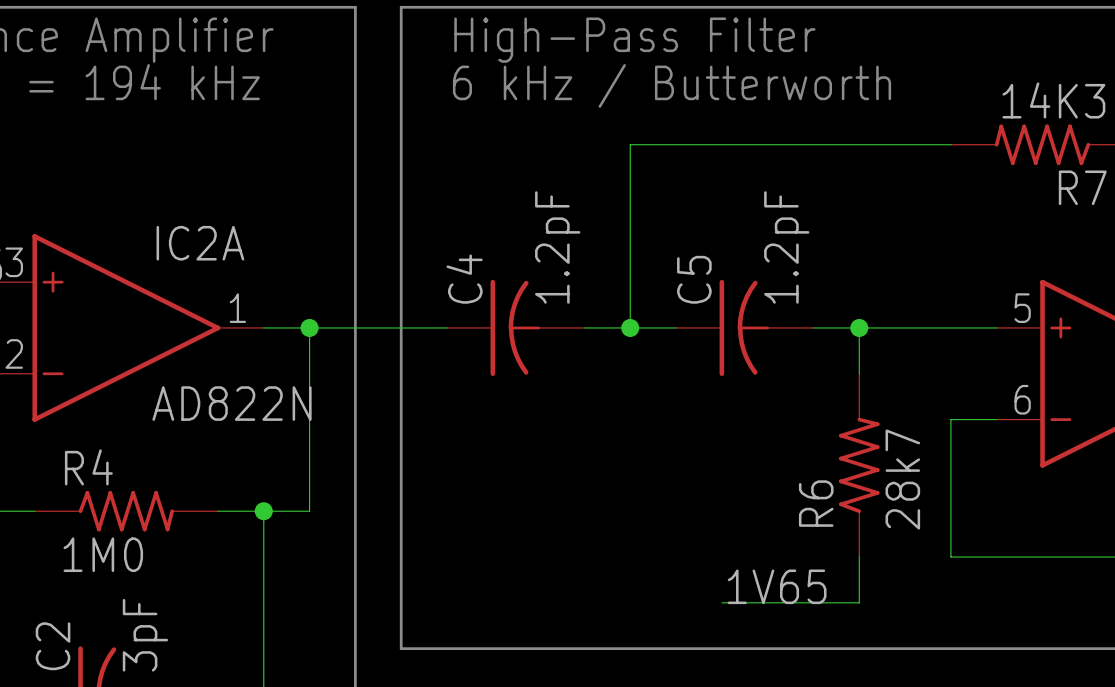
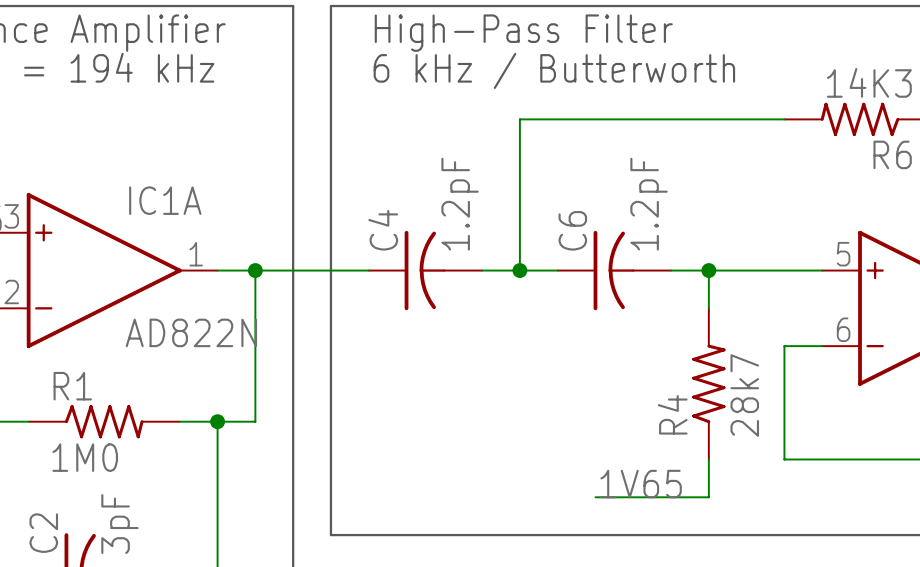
R7 name: R7 (1082, 187) -> R6 (892, 154)
IC2A name: IC2A (200, 243) -> IC1A (165, 200)
C5 name: C5 (694, 279) -> C6 (572, 230)
R4 name: R4 (88, 467) -> R1 (72, 386)
R6 name: R6 (816, 503) -> R4 (672, 414)

